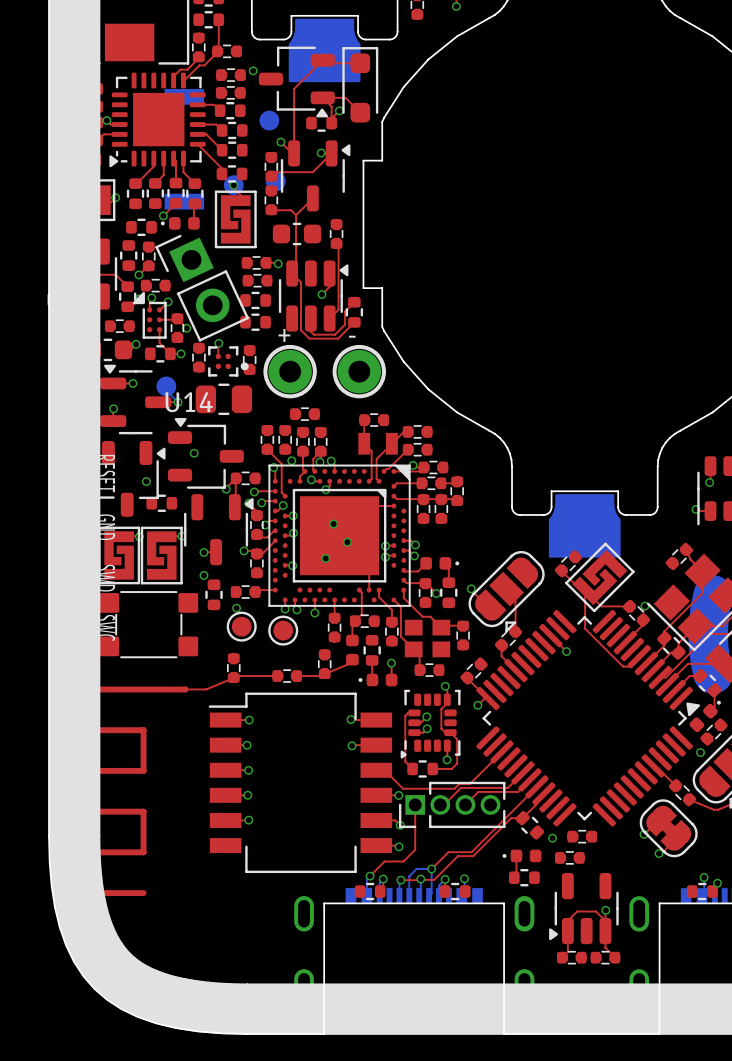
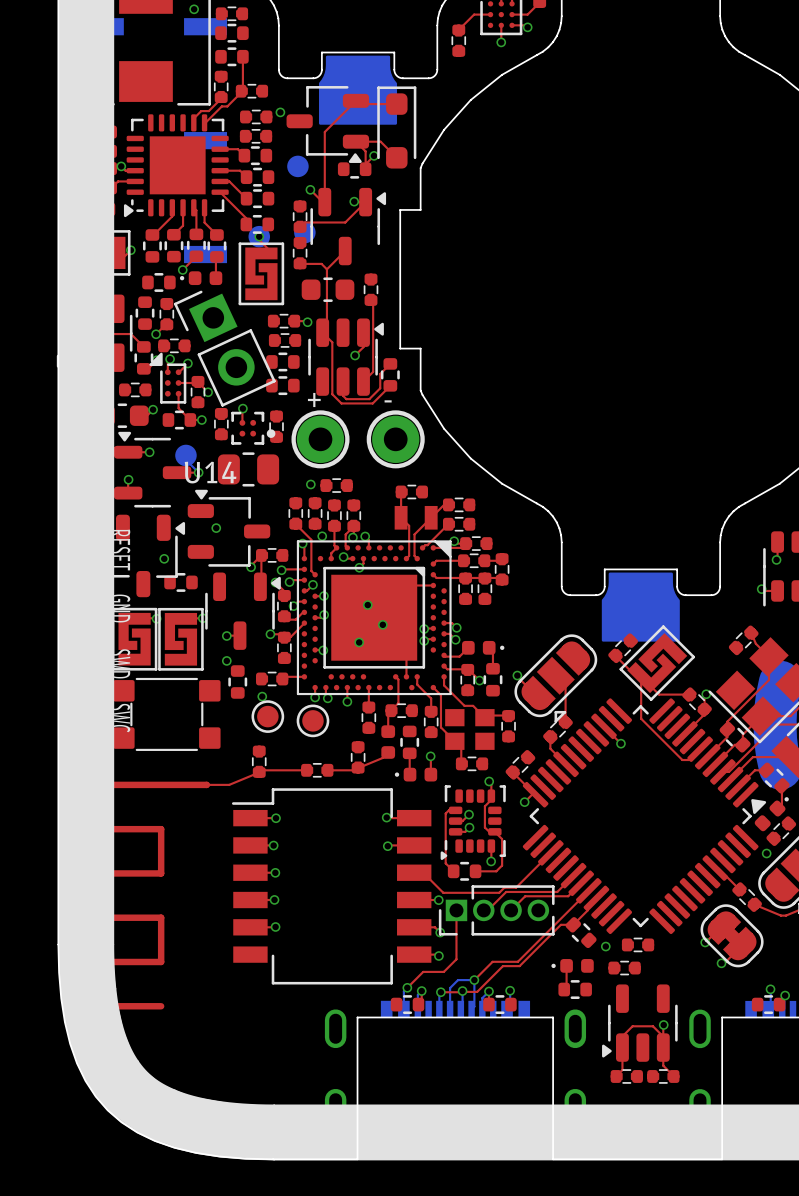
via: none -> (310, 484)

